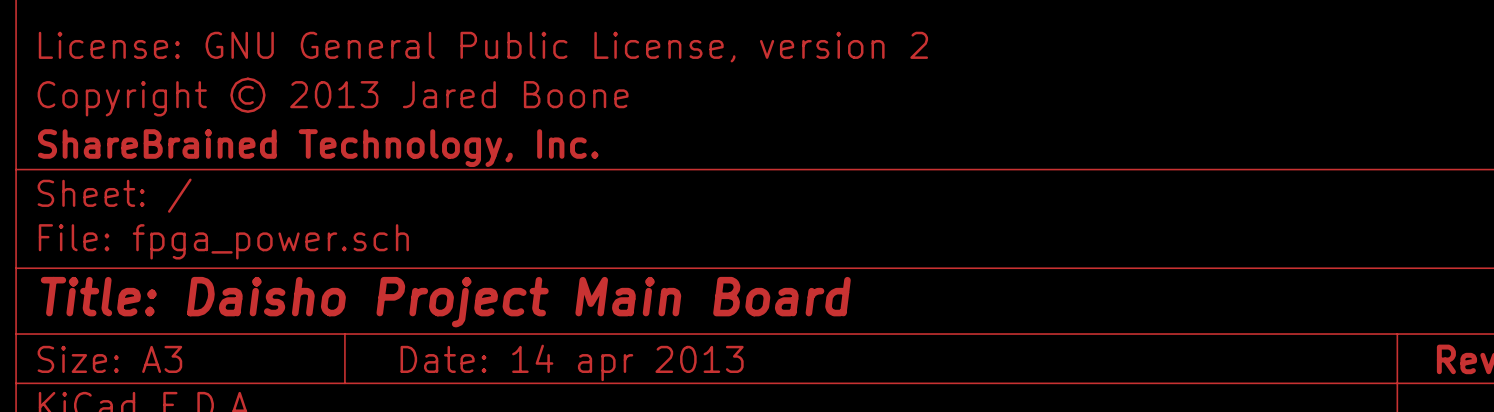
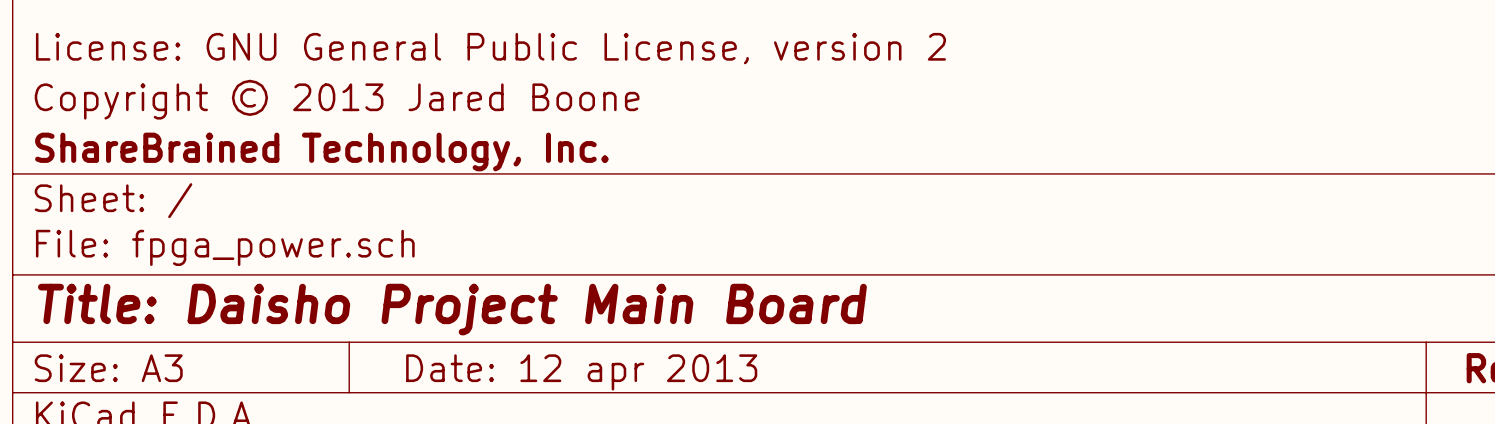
title block: Date: 14 apr 2013 (572, 362) -> Date: 12 apr 2013 (581, 372)

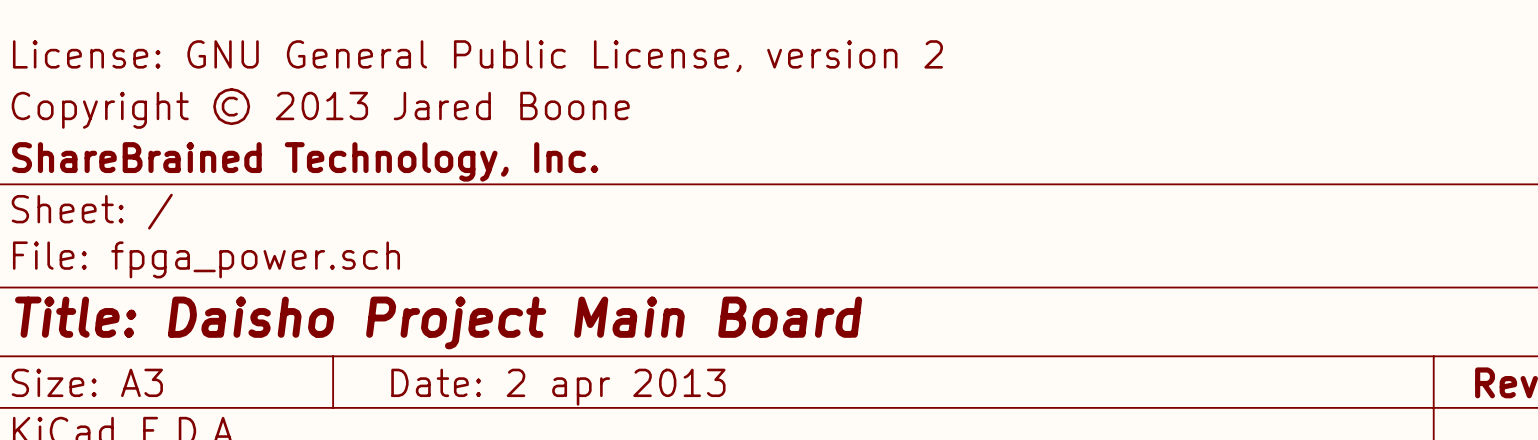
title block: Date: 12 apr 2013 (581, 372) -> Date: 2 apr 2013 (558, 387)

